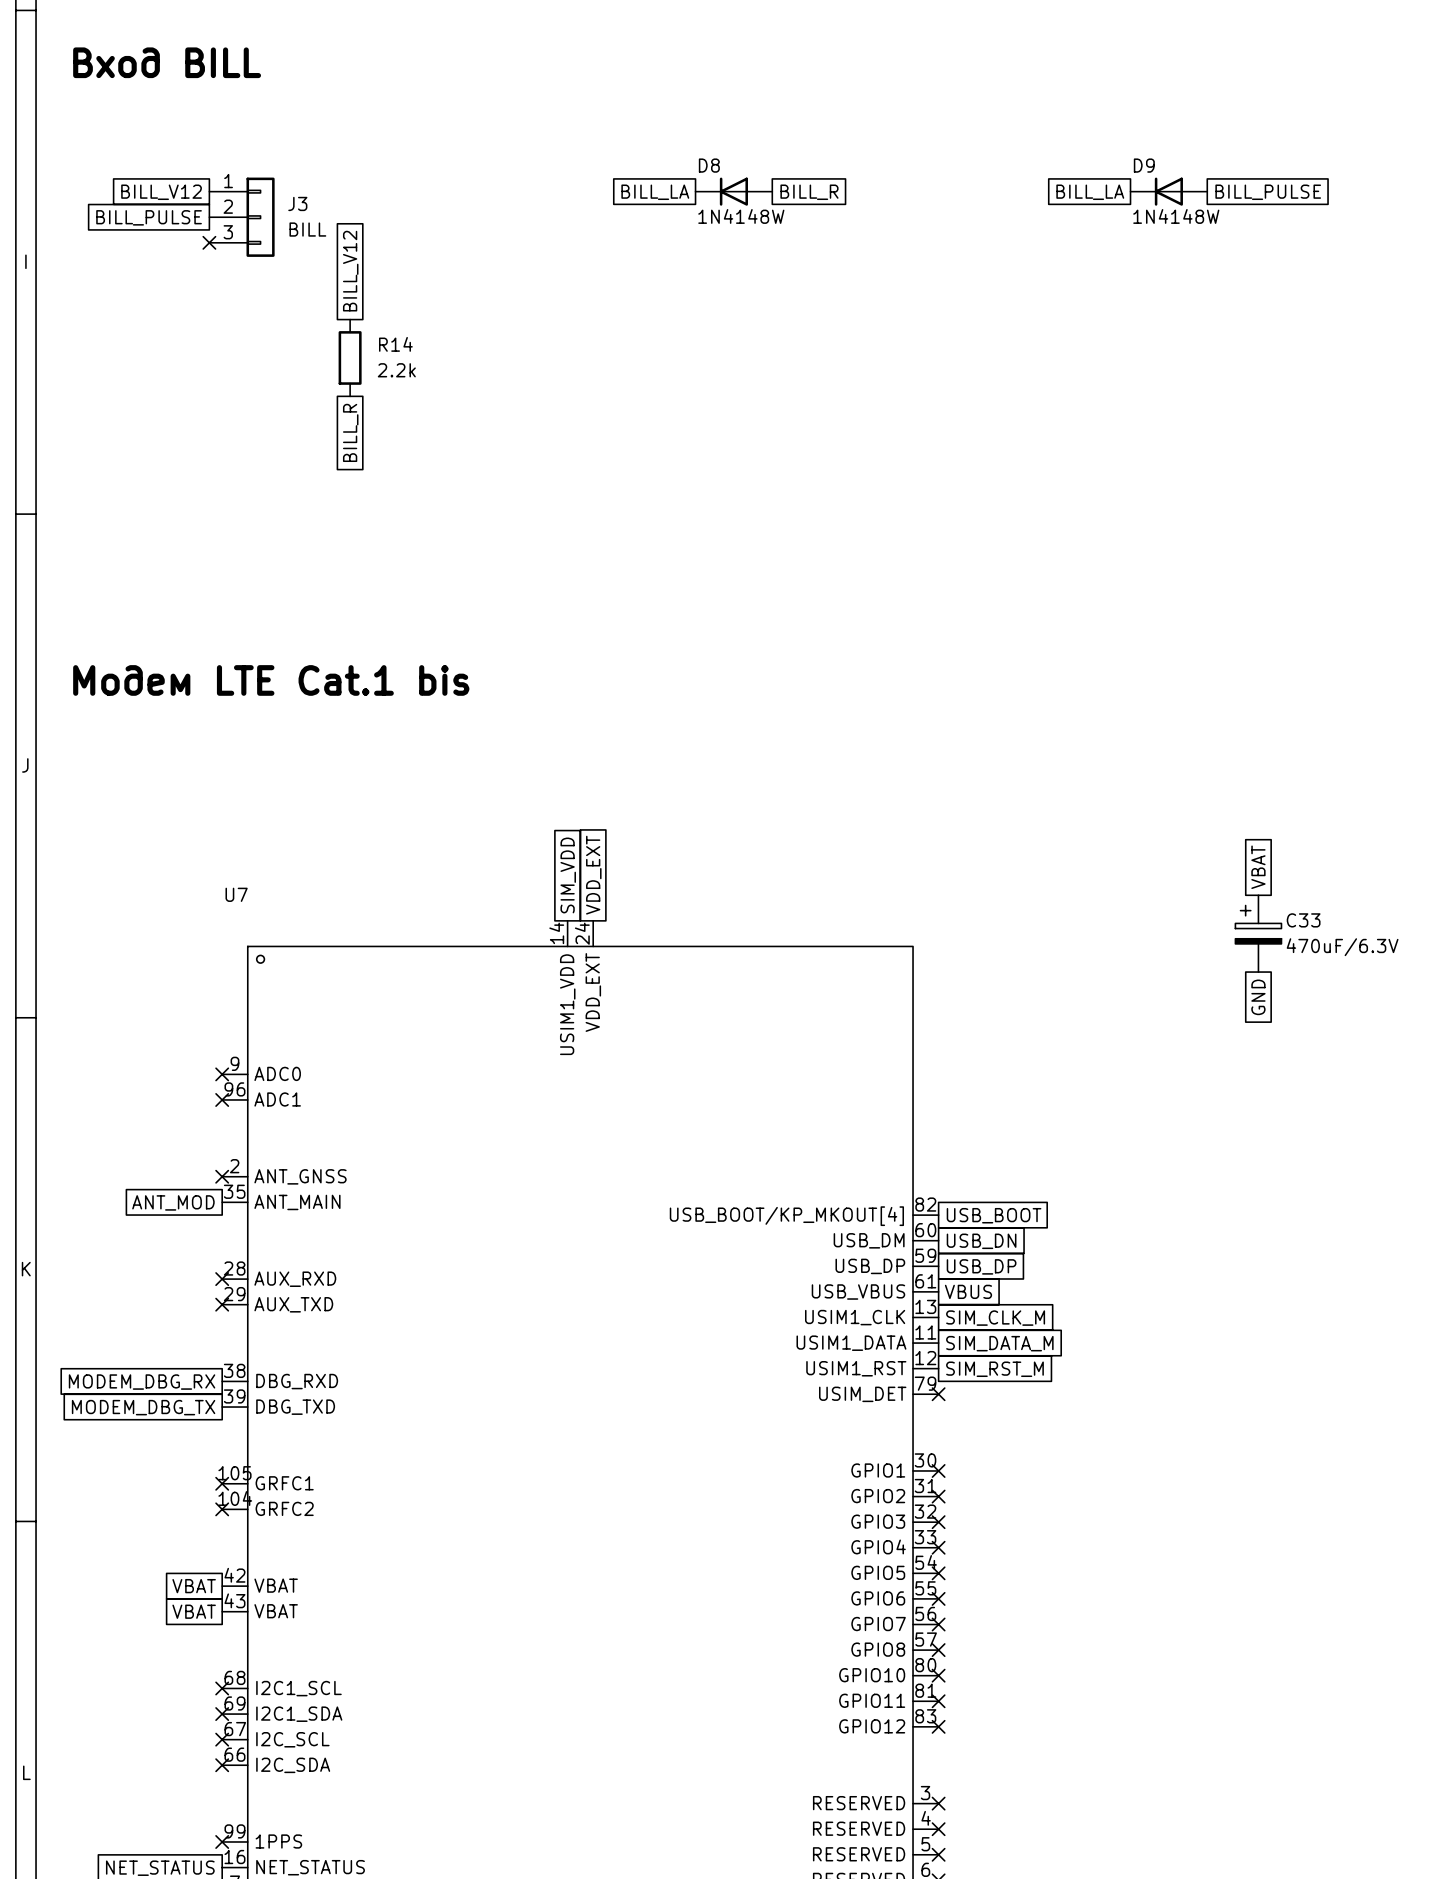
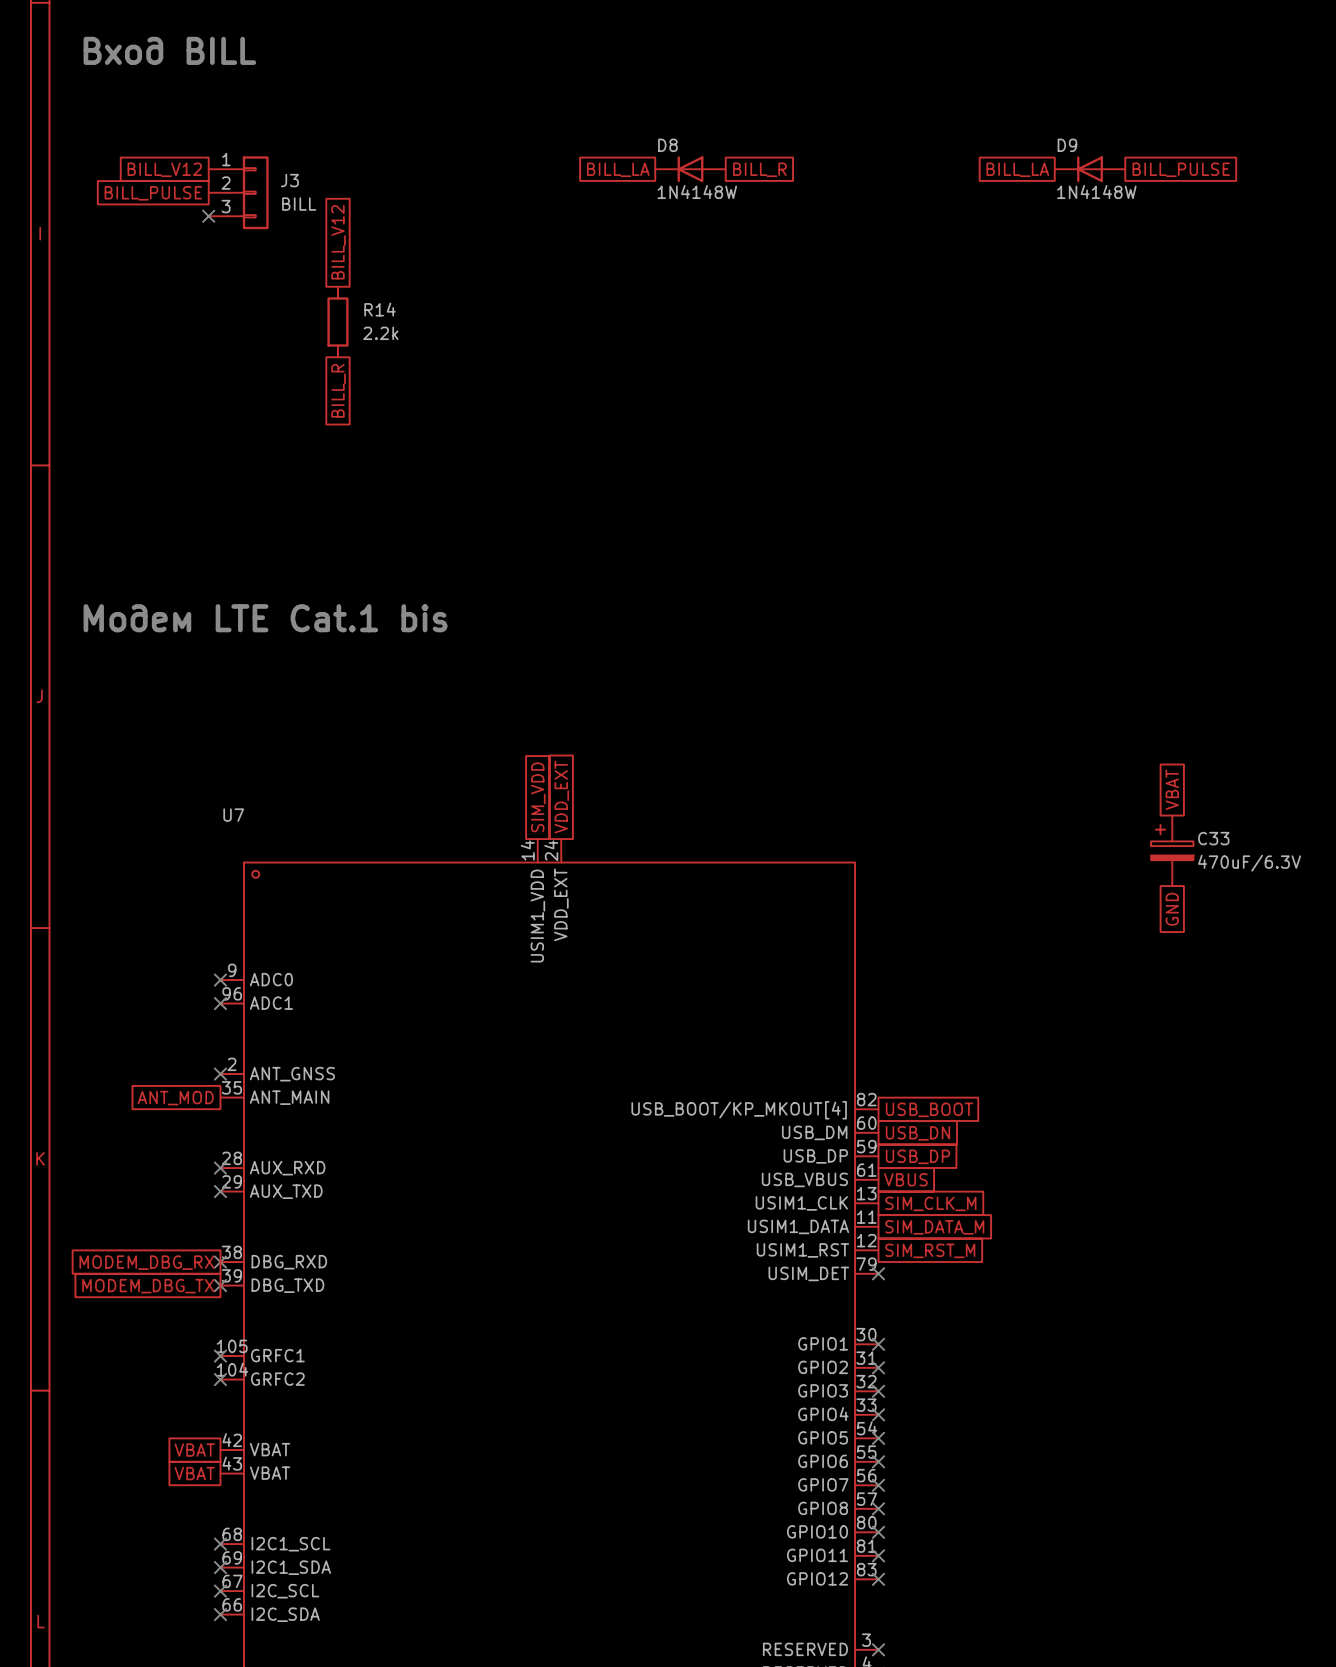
no-connect mark: none -> (220, 1262)
no-connect mark: none -> (220, 1285)

